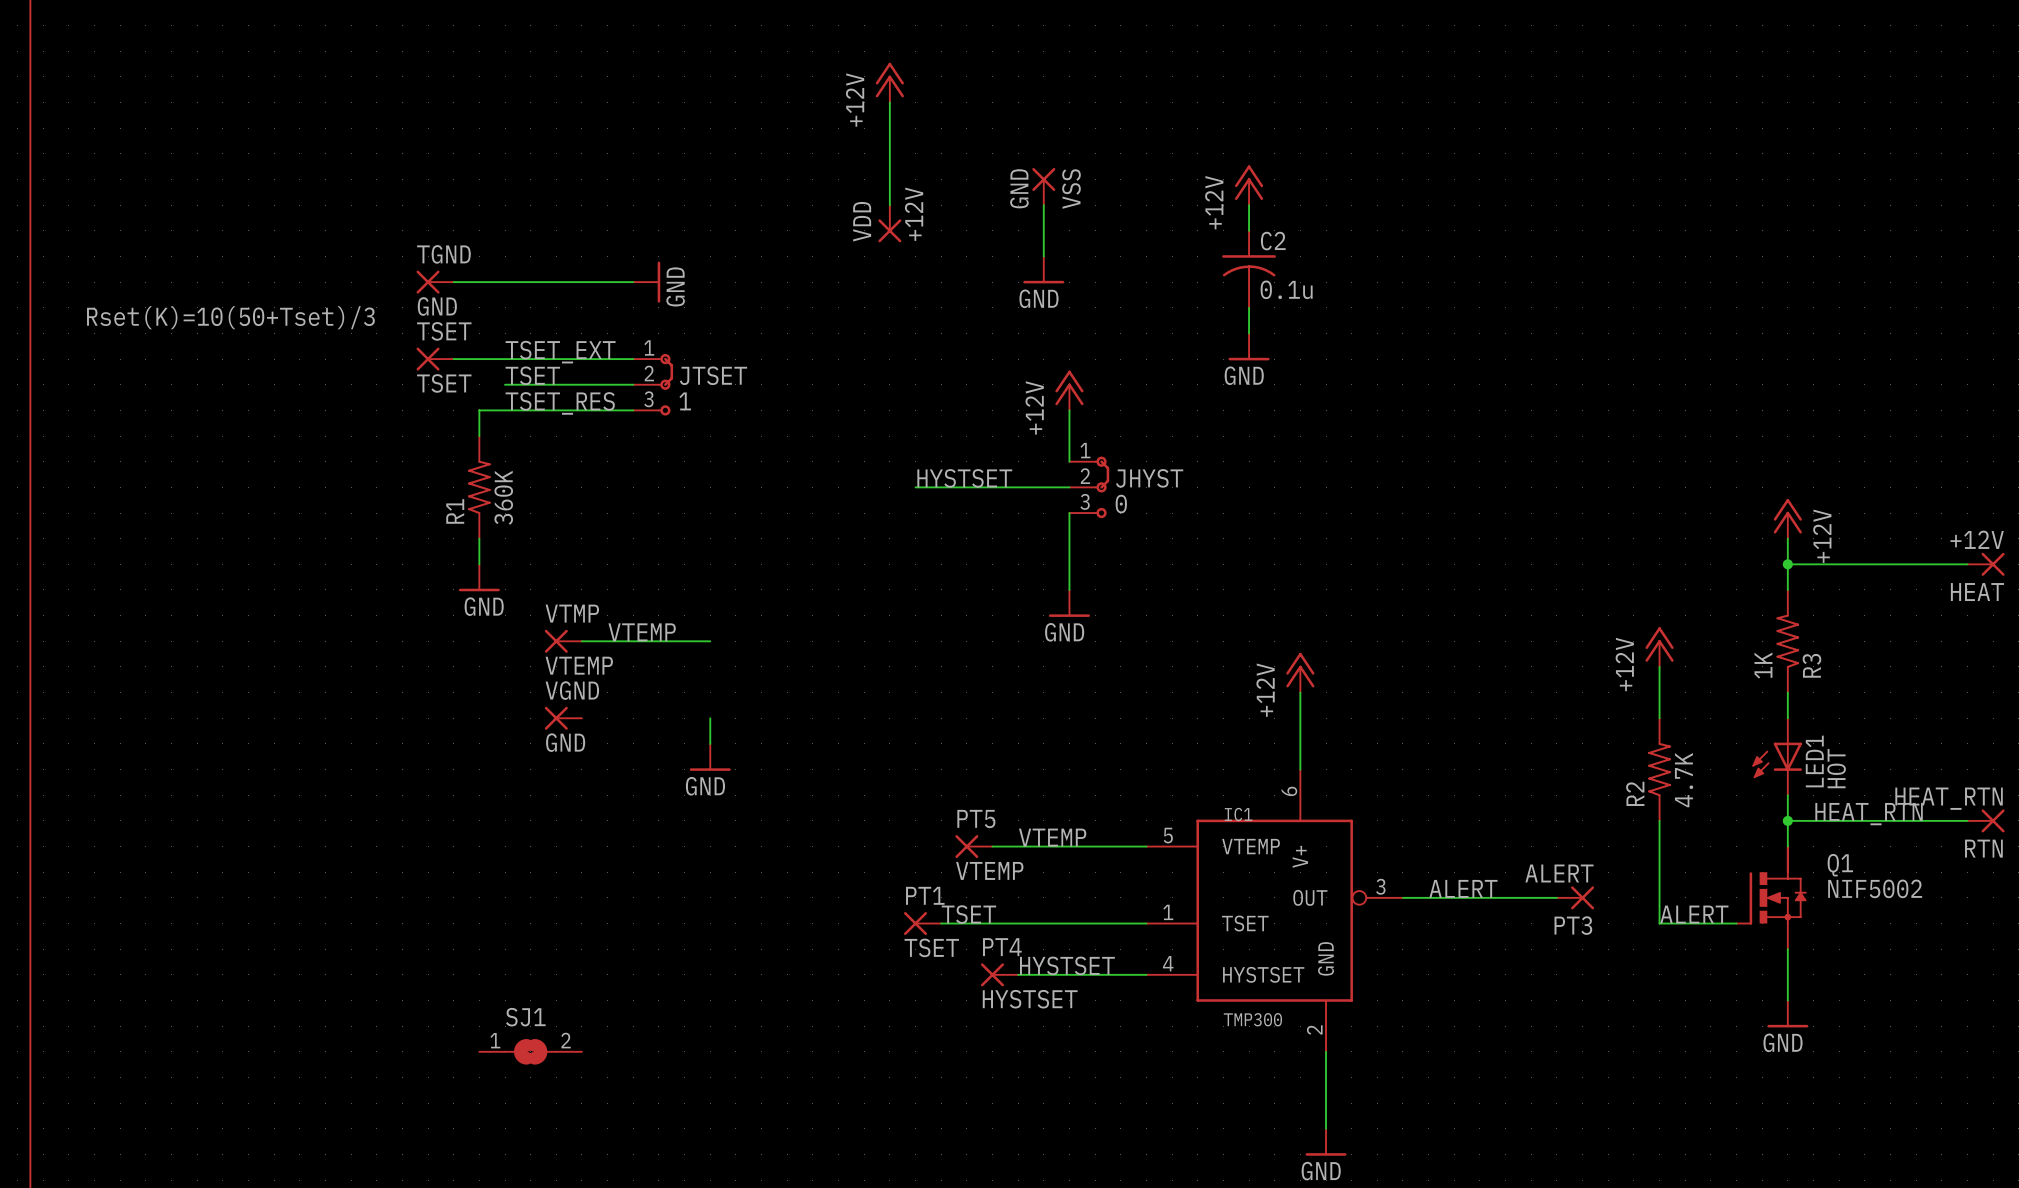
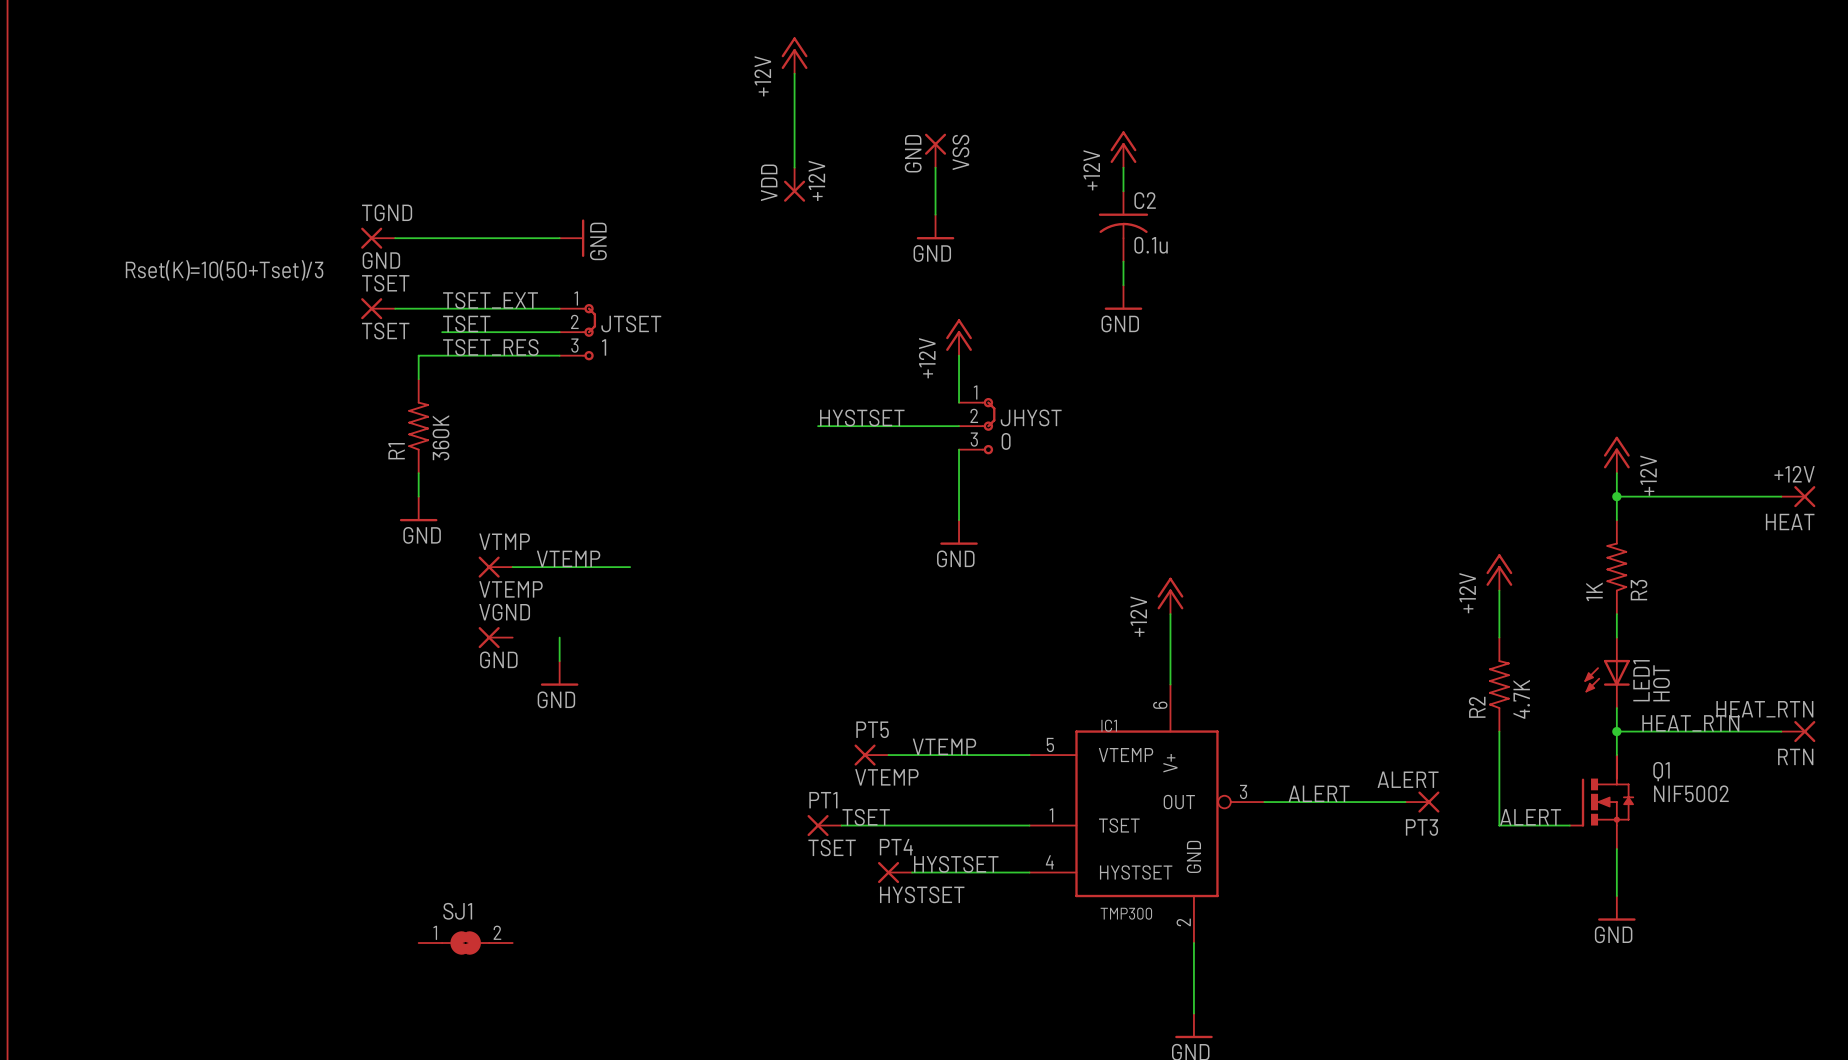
wire: (710, 718) (710, 743) -> (559, 637) (559, 661)
power symbol position: GND (710, 757) -> GND (559, 673)

